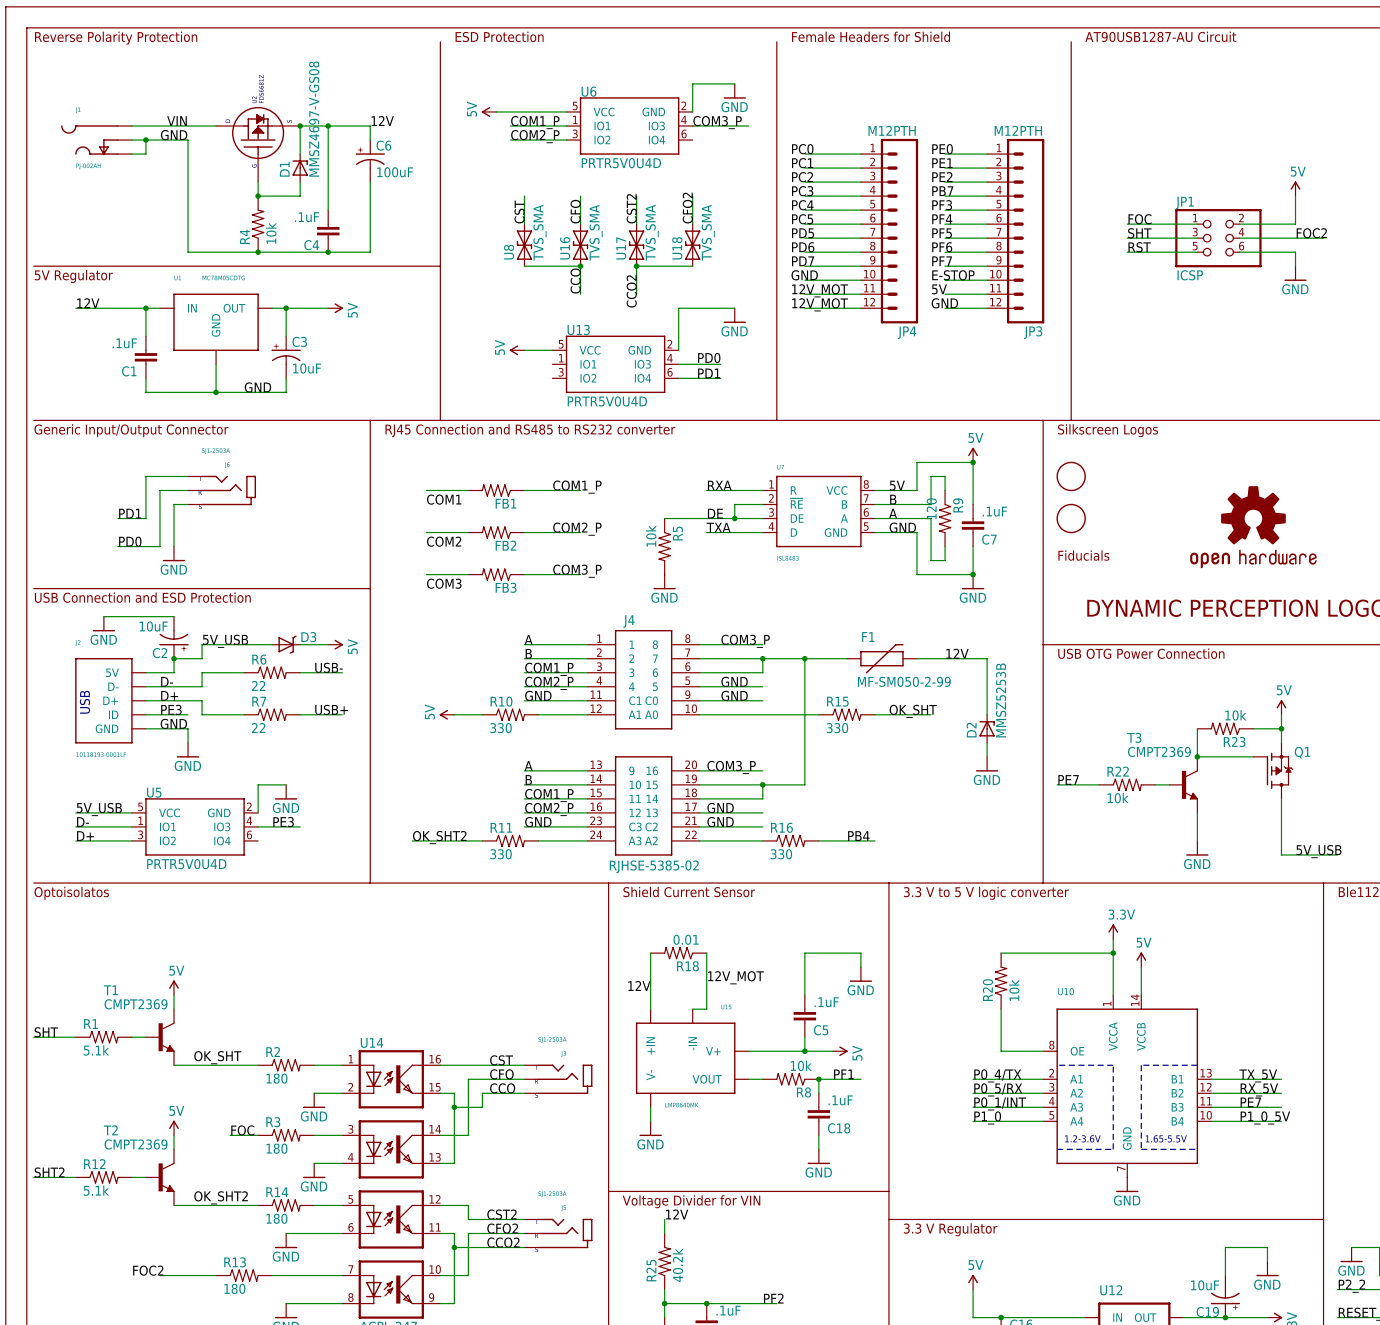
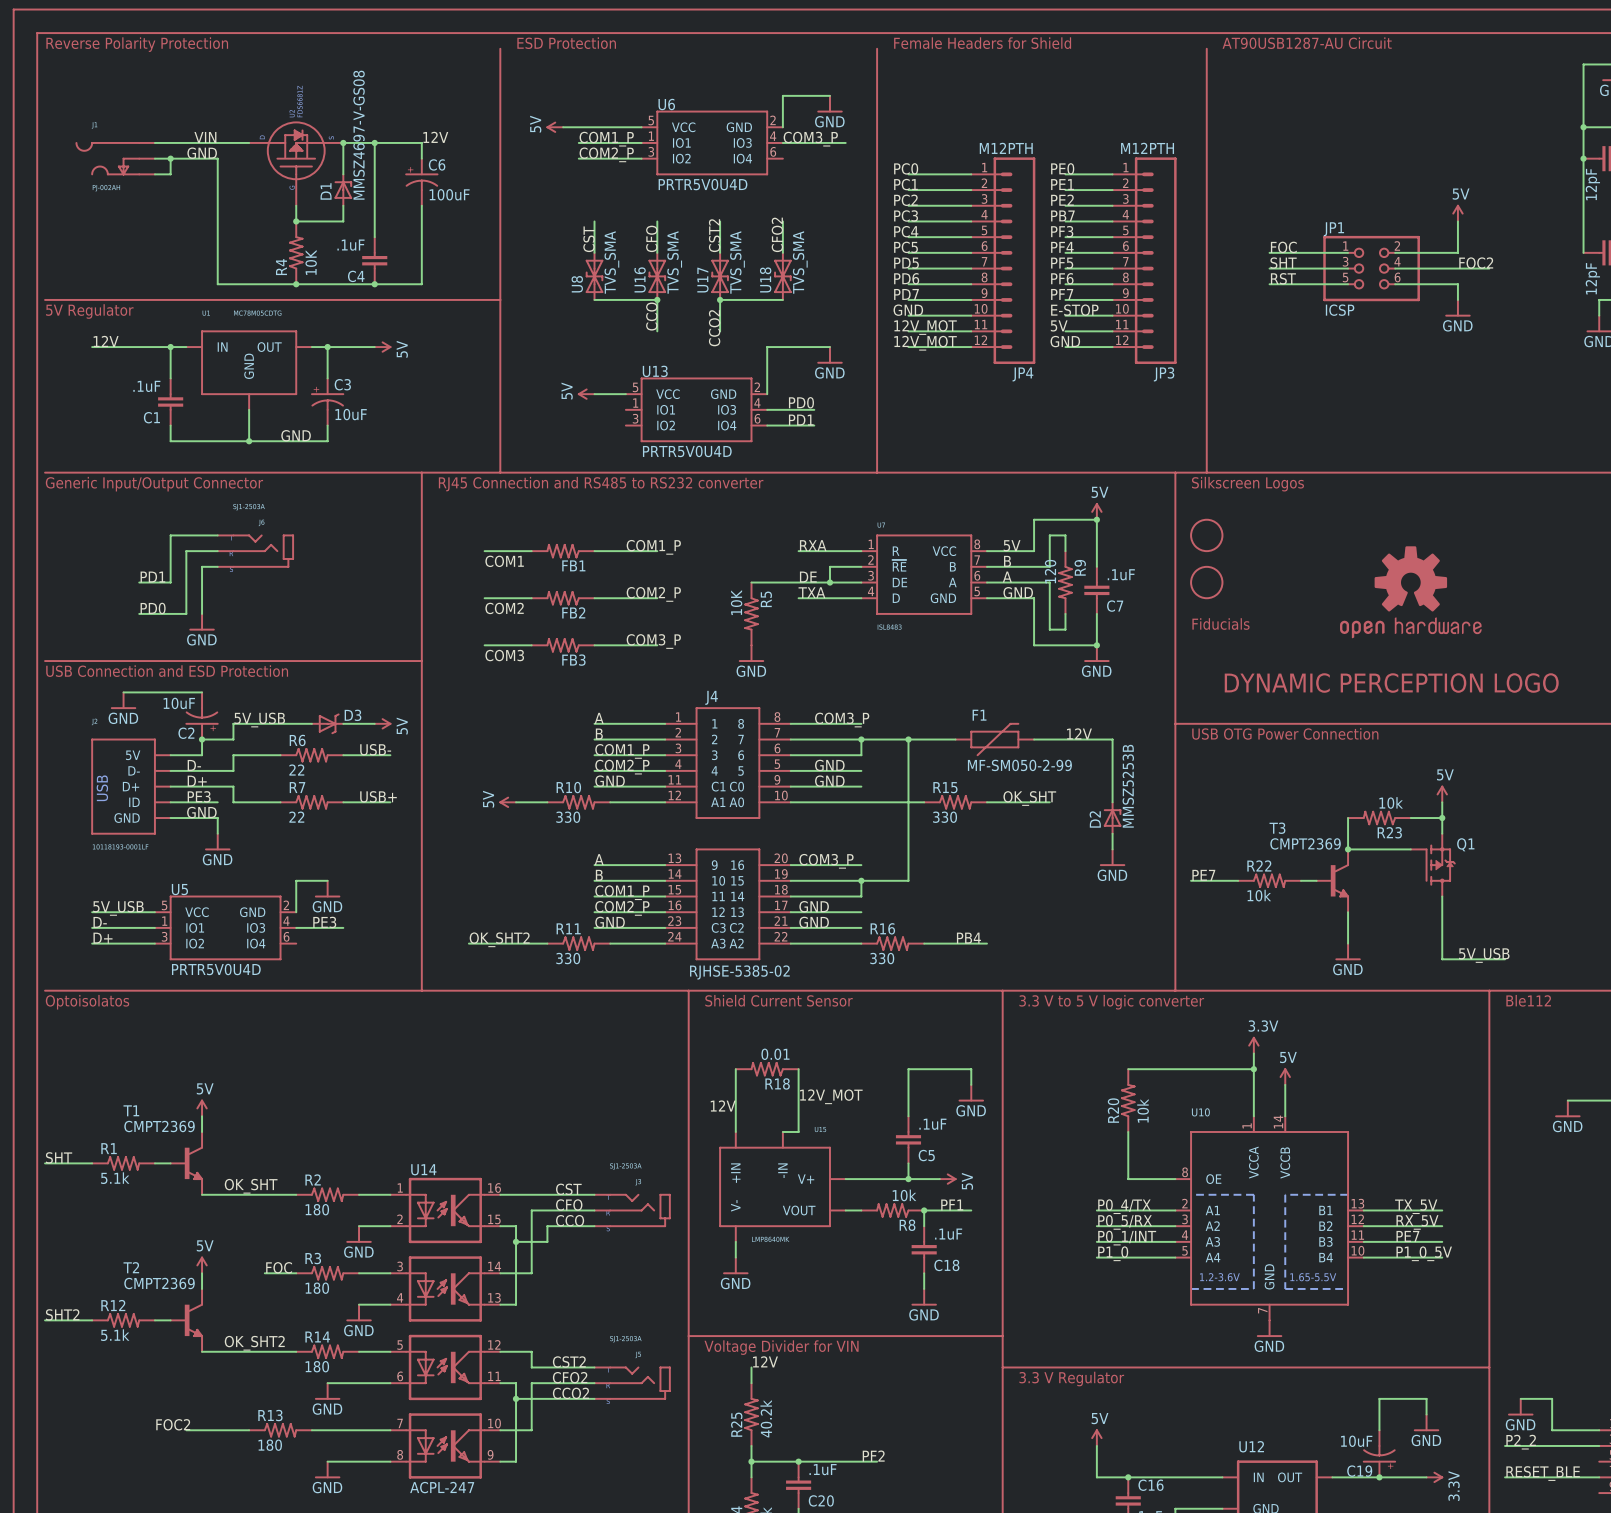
R4 value: 10k (271, 233) -> 10K (311, 262)
R5 value: 10k (651, 536) -> 10K (736, 602)

